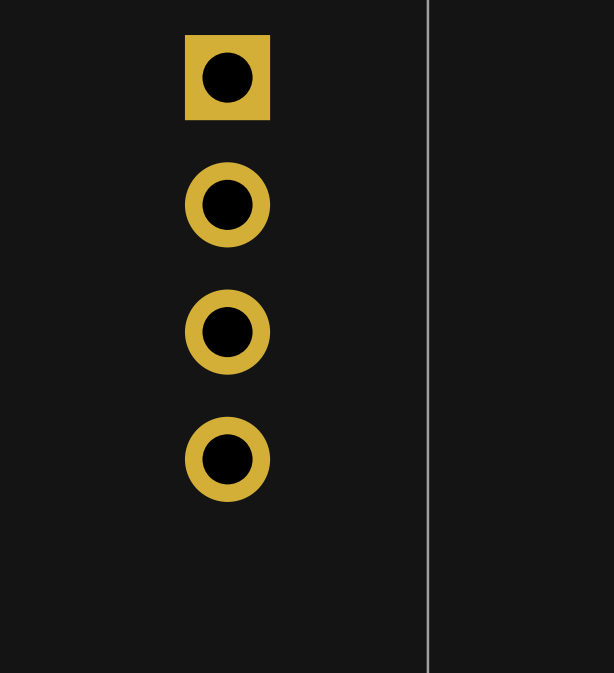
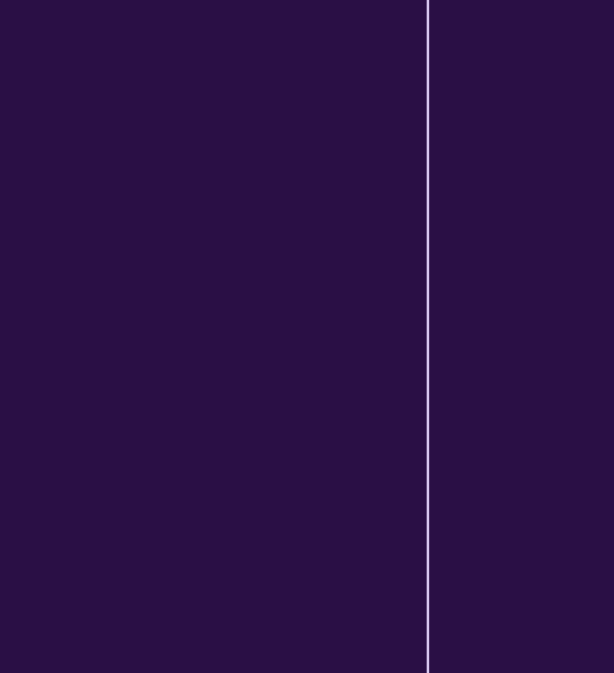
part: (227, 268) -> none

